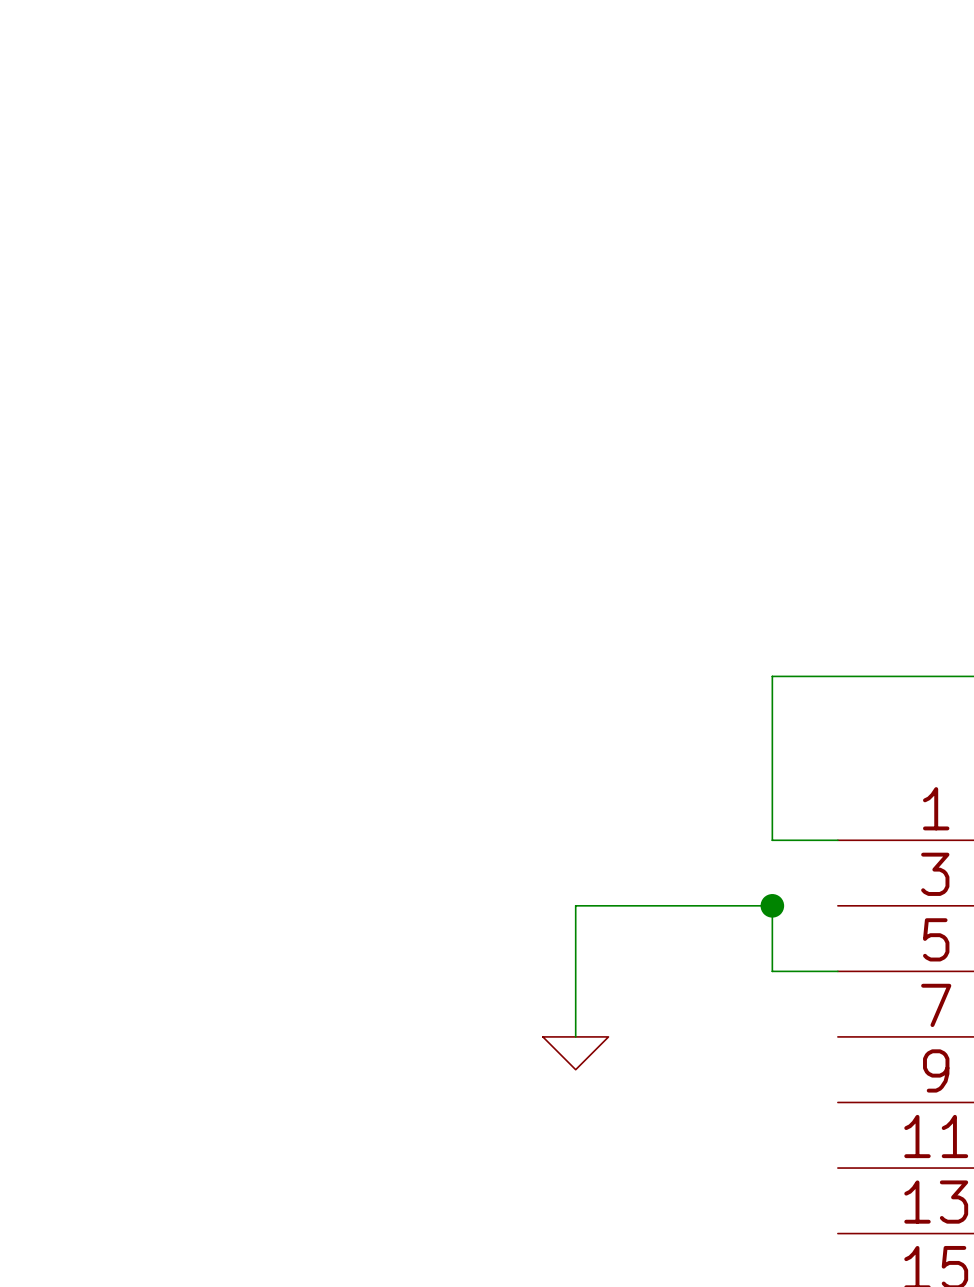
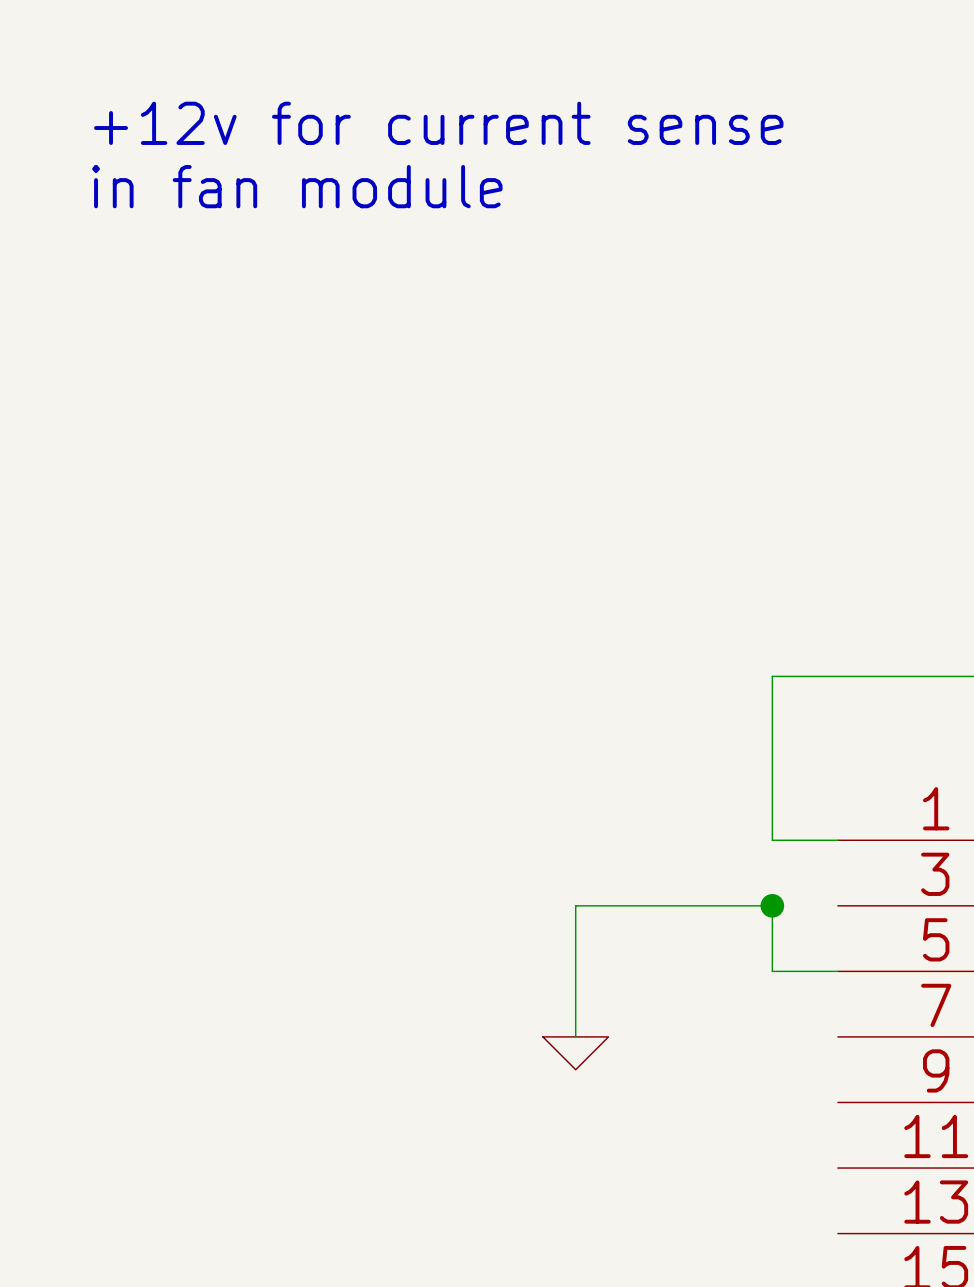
text: none -> +12v for current sense (438, 123)
text: none -> in fan module (297, 186)

